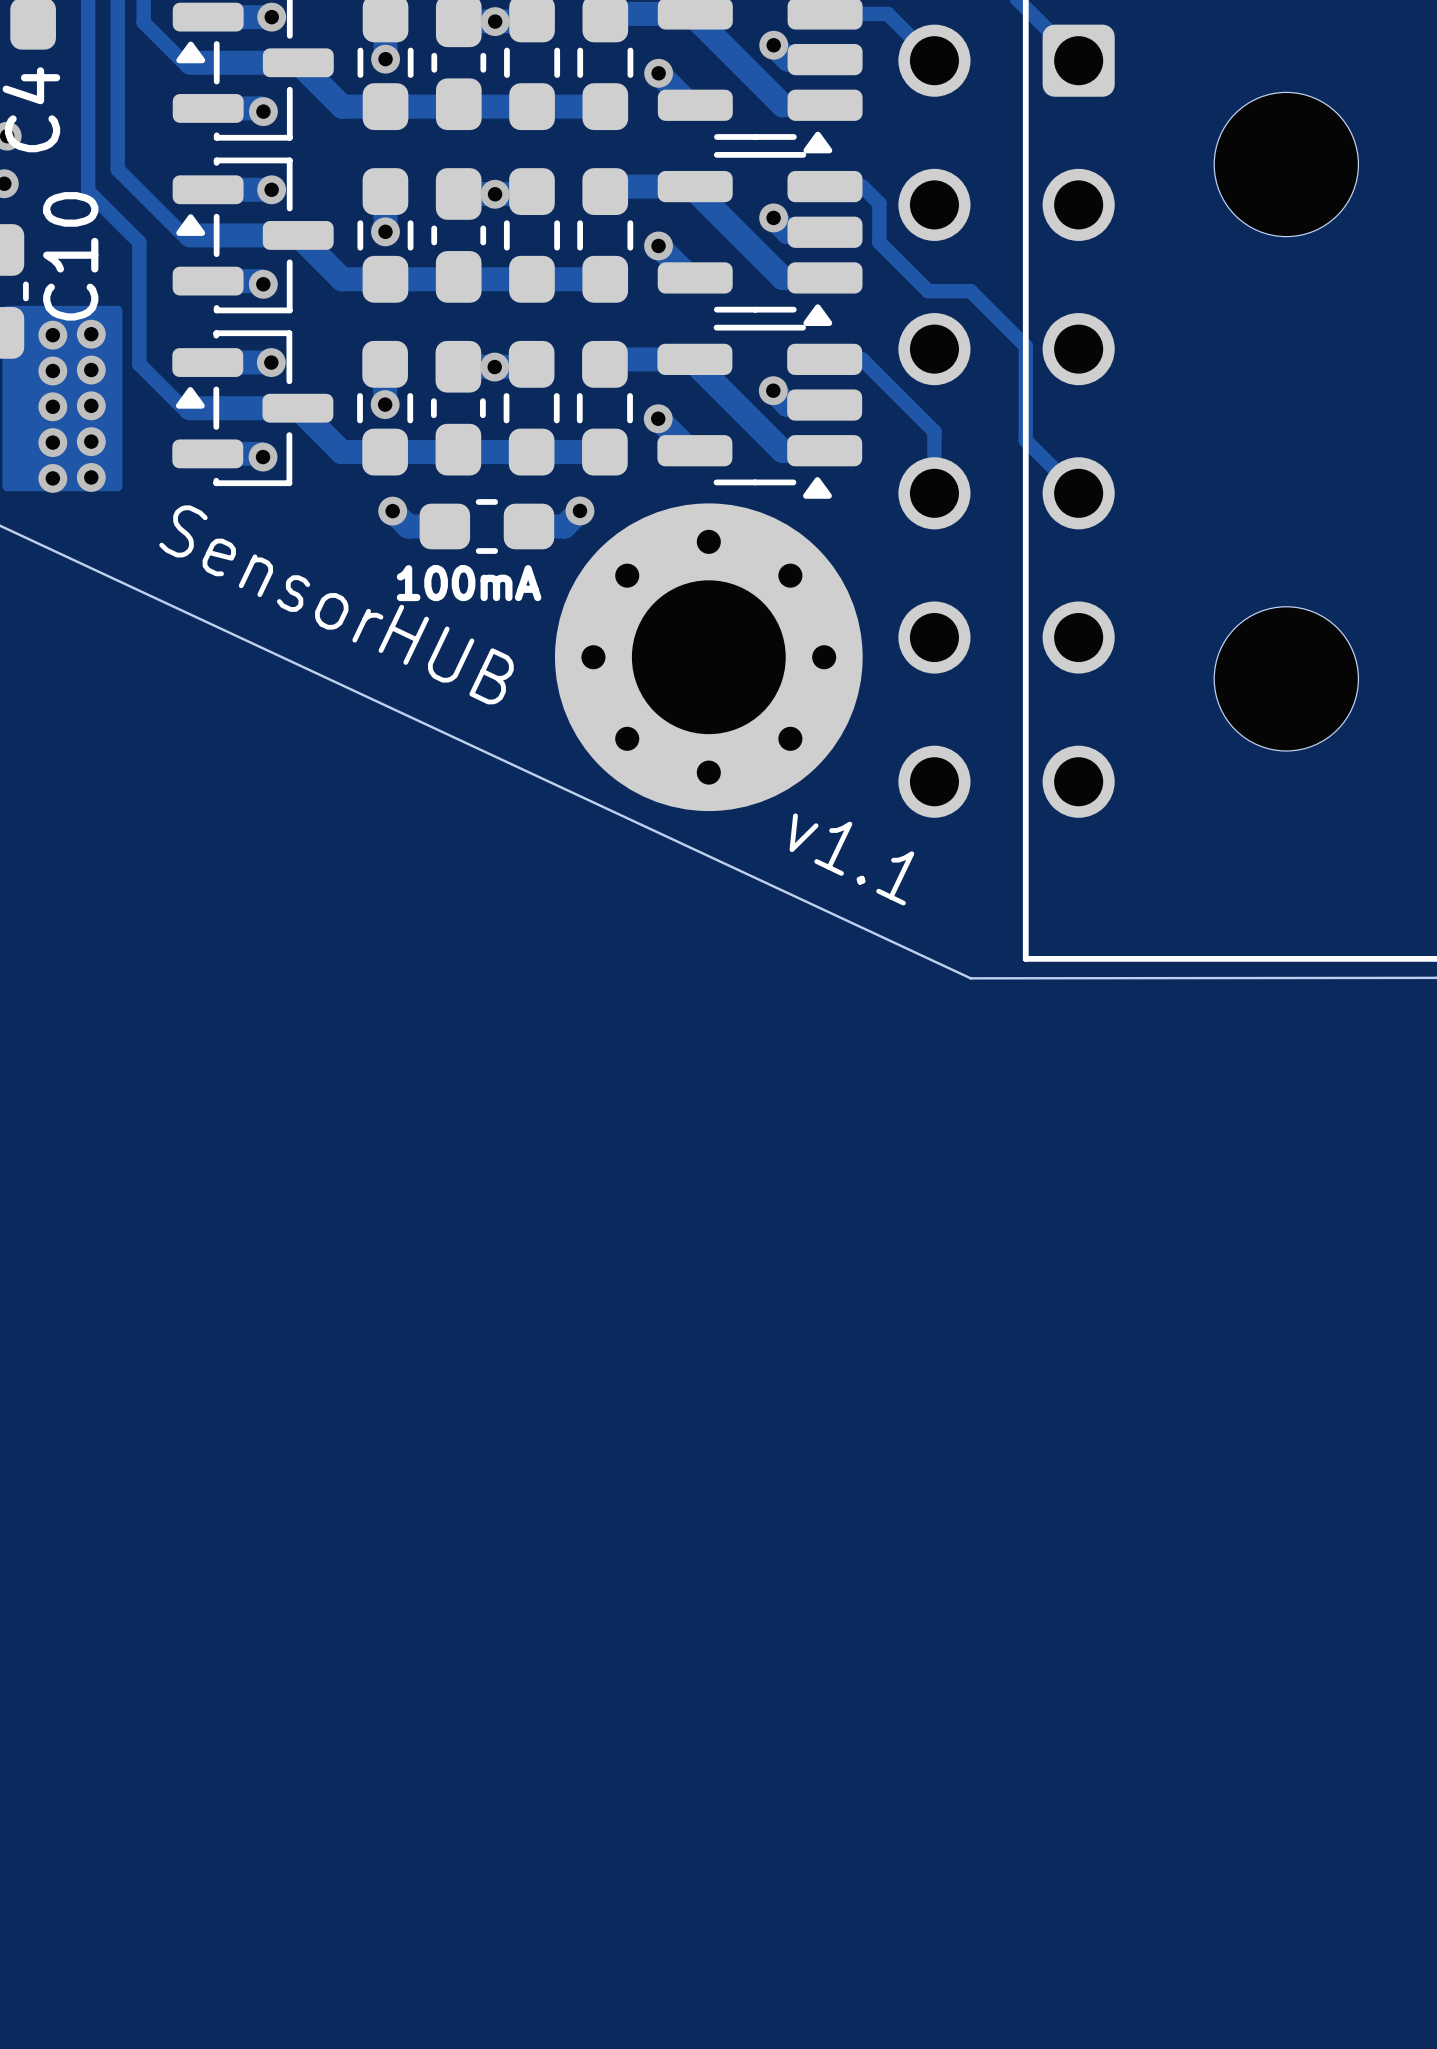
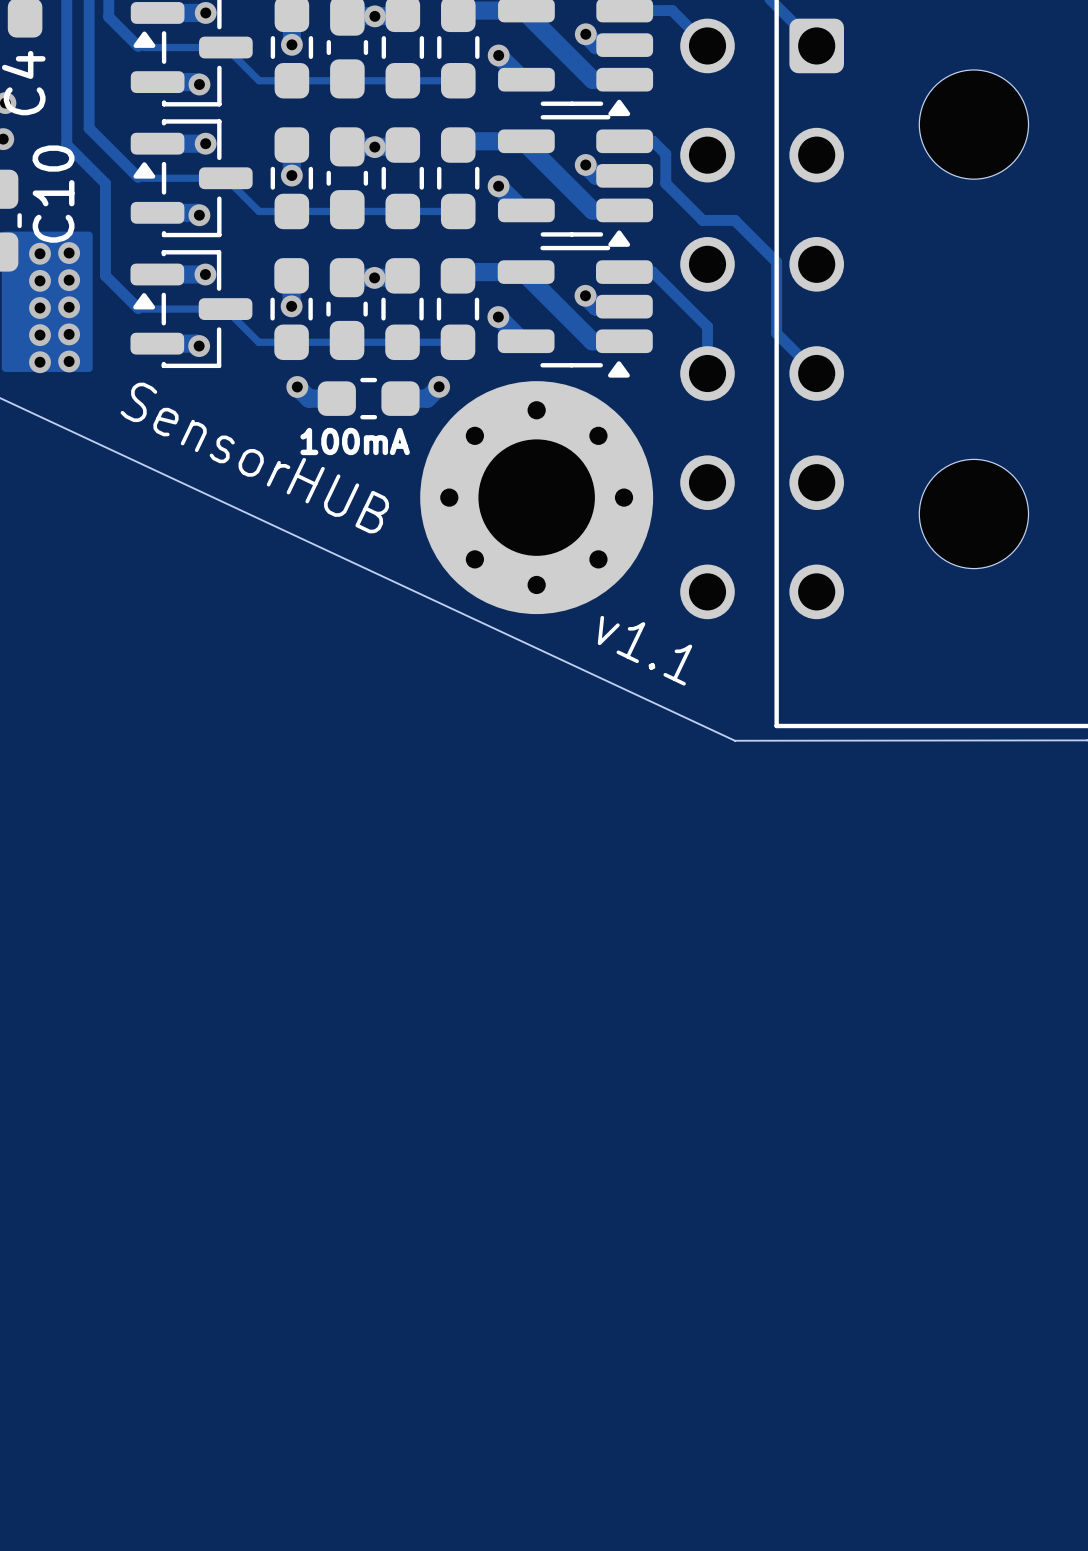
track width: thick (190, 62) (298, 62) (342, 106) (605, 106) -> thin (143, 47) (225, 47) (259, 80) (458, 80)
track width: thick (190, 235) (298, 235) (342, 279) (605, 279) -> thin (143, 178) (225, 178) (259, 211) (458, 211)
track width: thick (189, 408) (297, 408) (341, 452) (604, 452) -> thin (143, 309) (225, 309) (258, 342) (457, 342)

